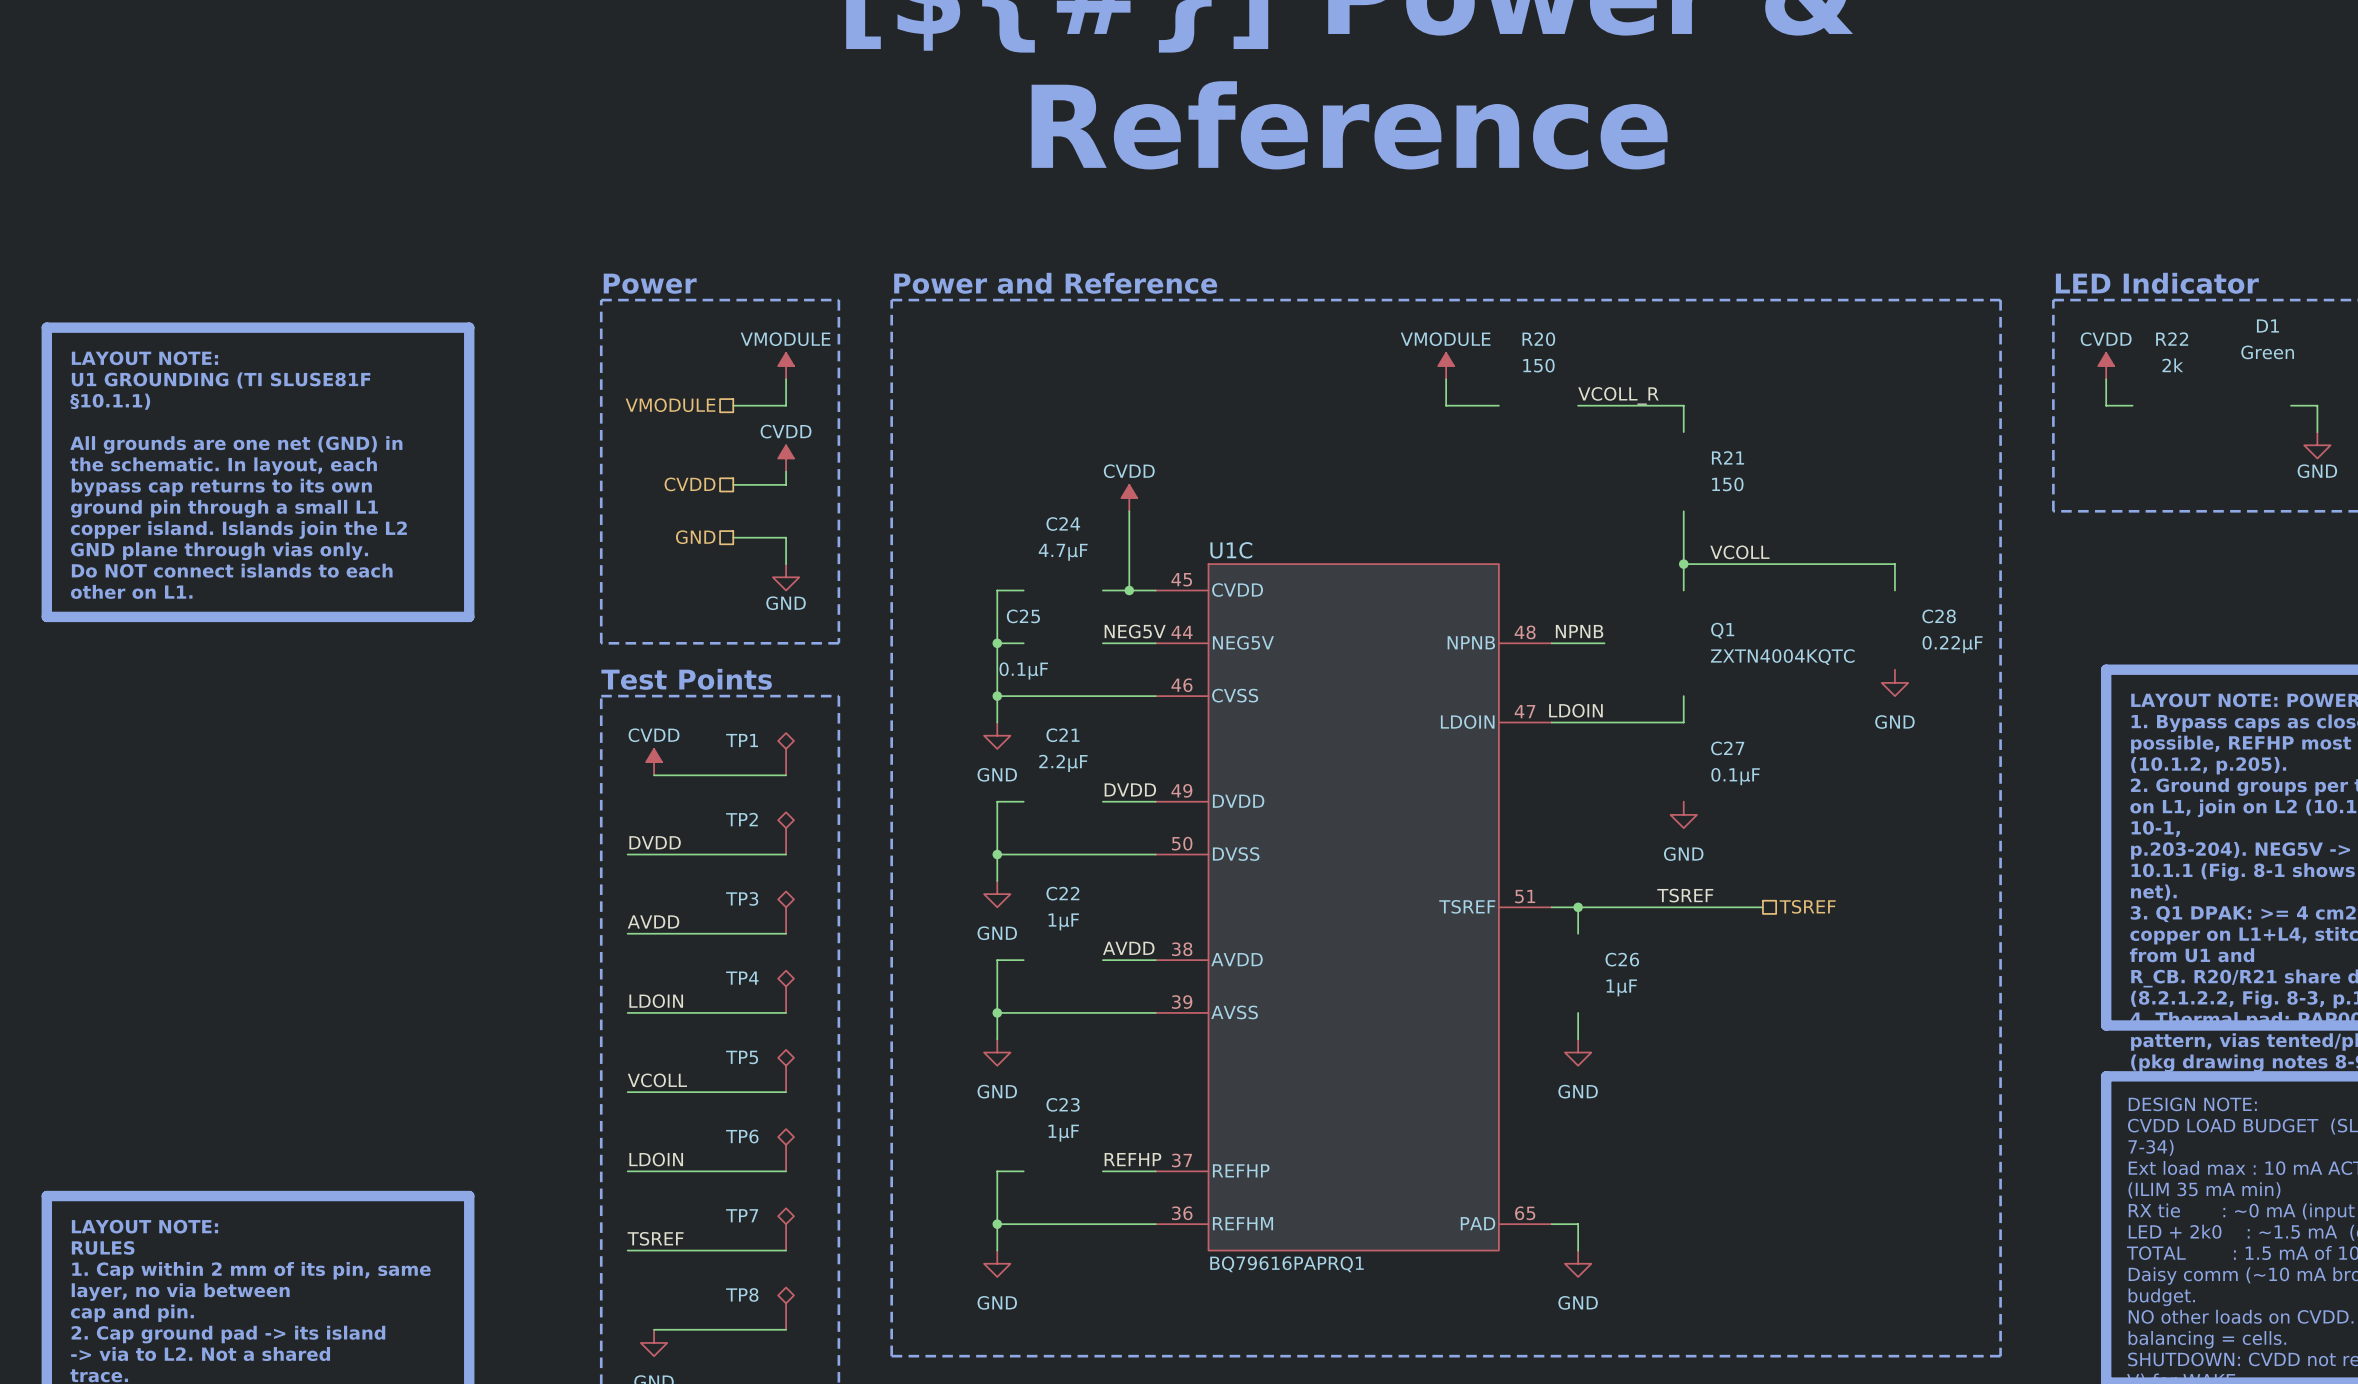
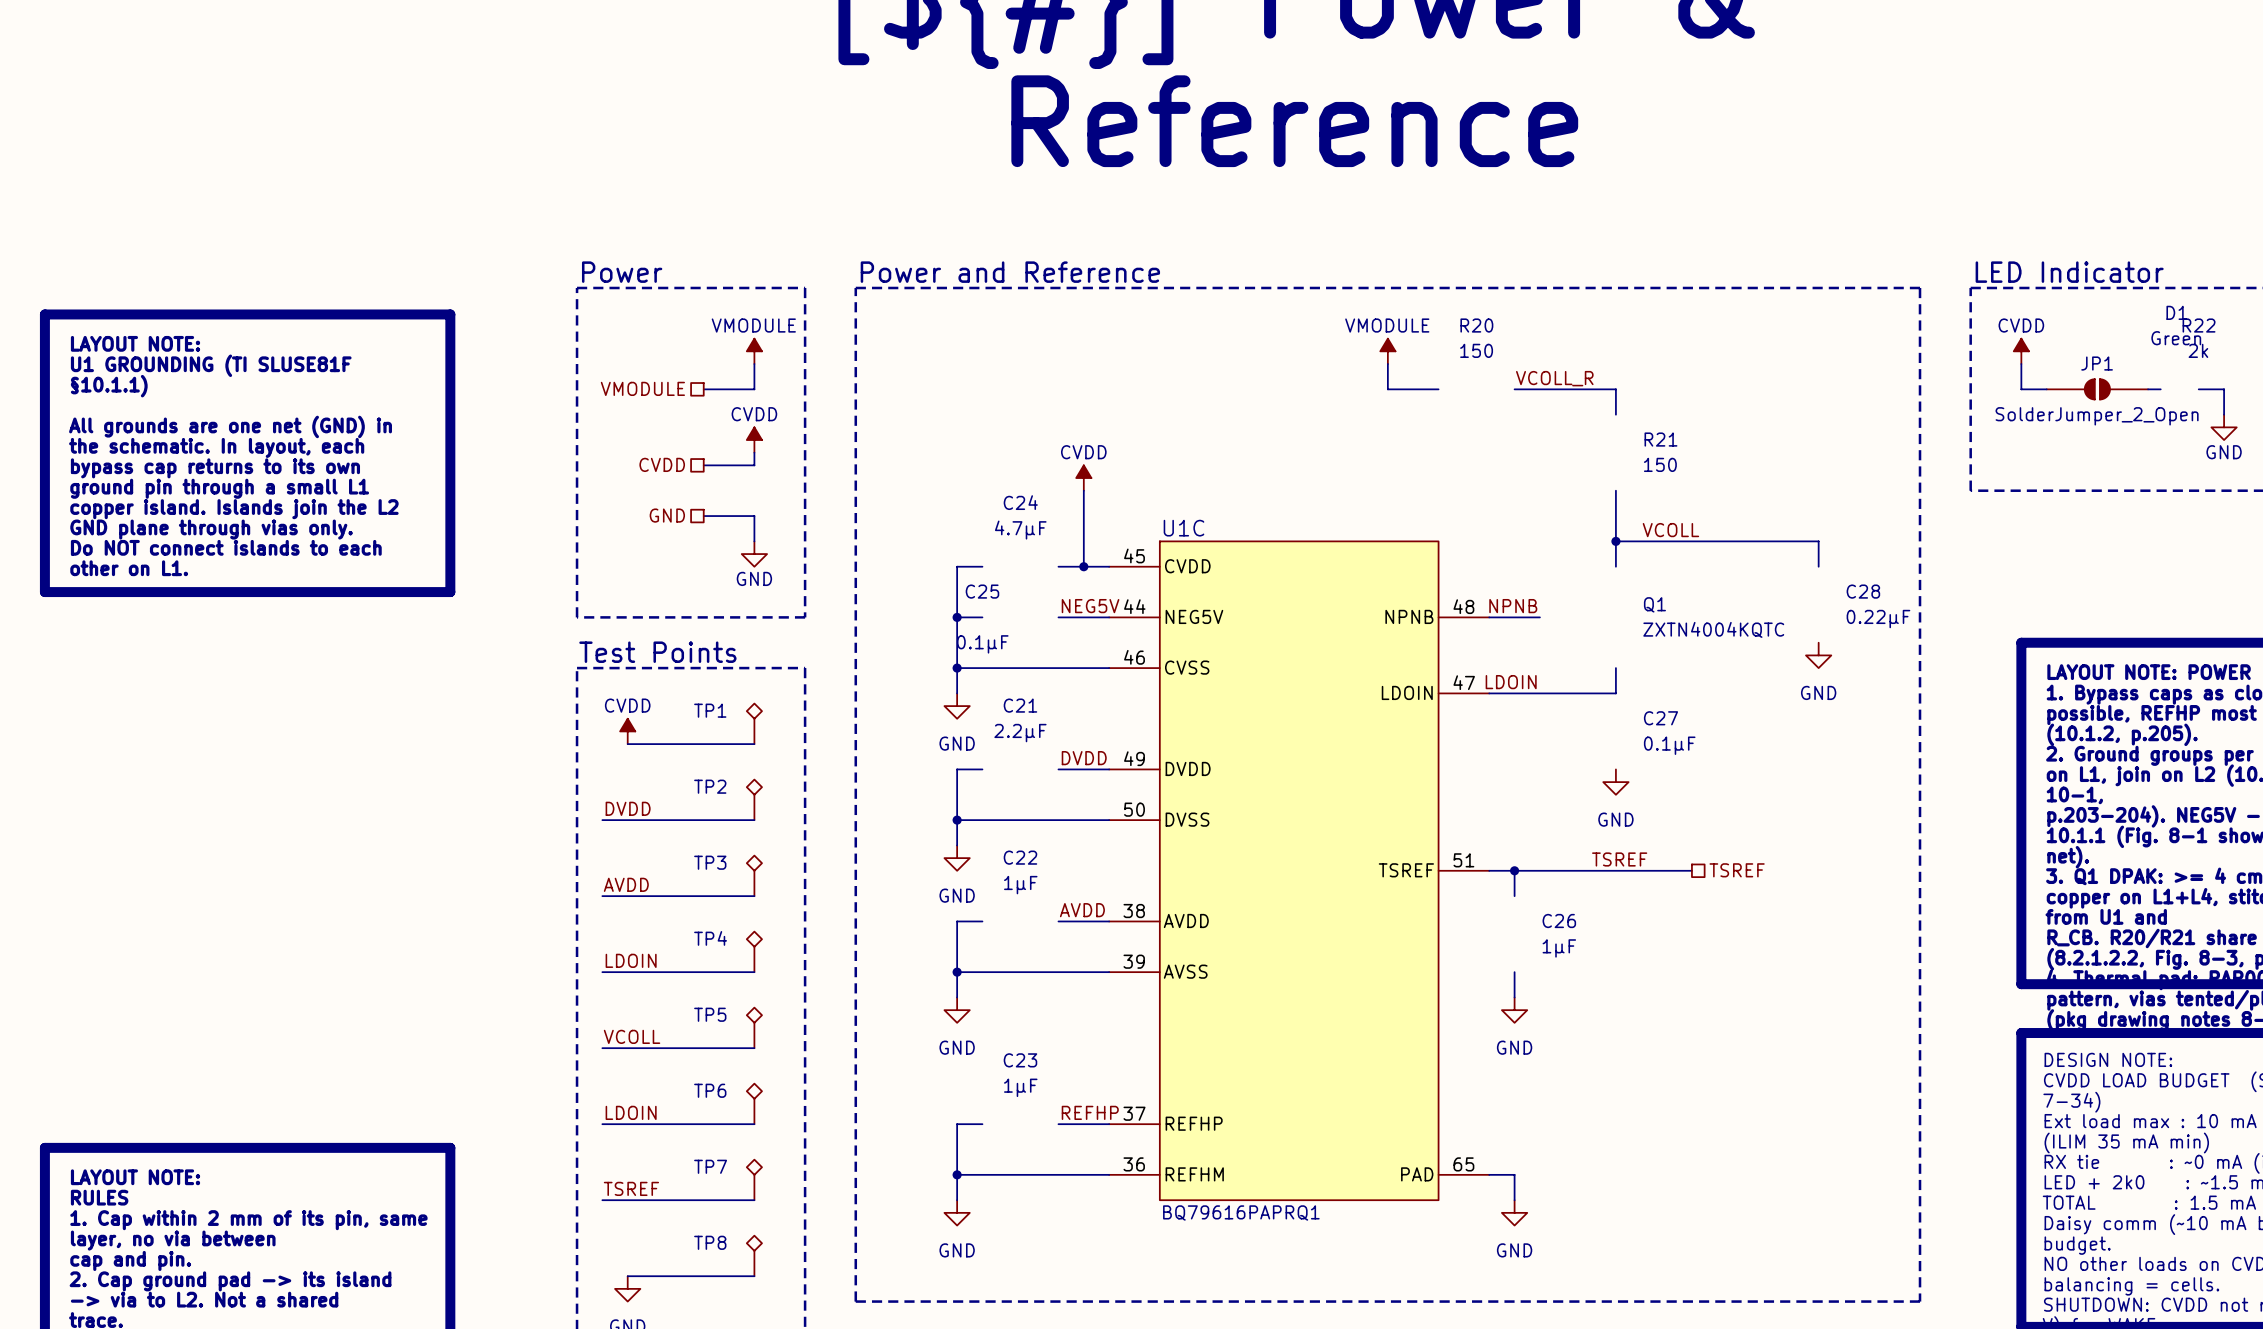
R22 position: (2172, 352) -> (2199, 338)
JP1: none -> SolderJumper_2_Open (2097, 389)
wire: none -> (2148, 389) (2160, 389)

